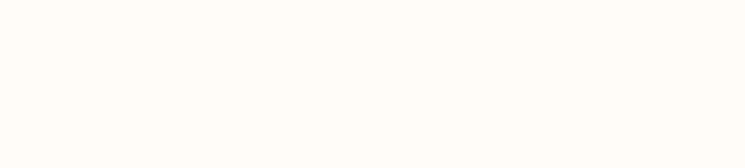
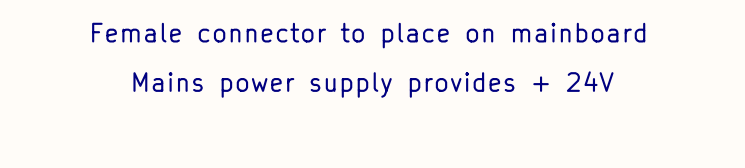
text: none -> Female connector to place on mainboard (368, 35)
text: none -> Mains power supply provides + 24V (373, 84)

